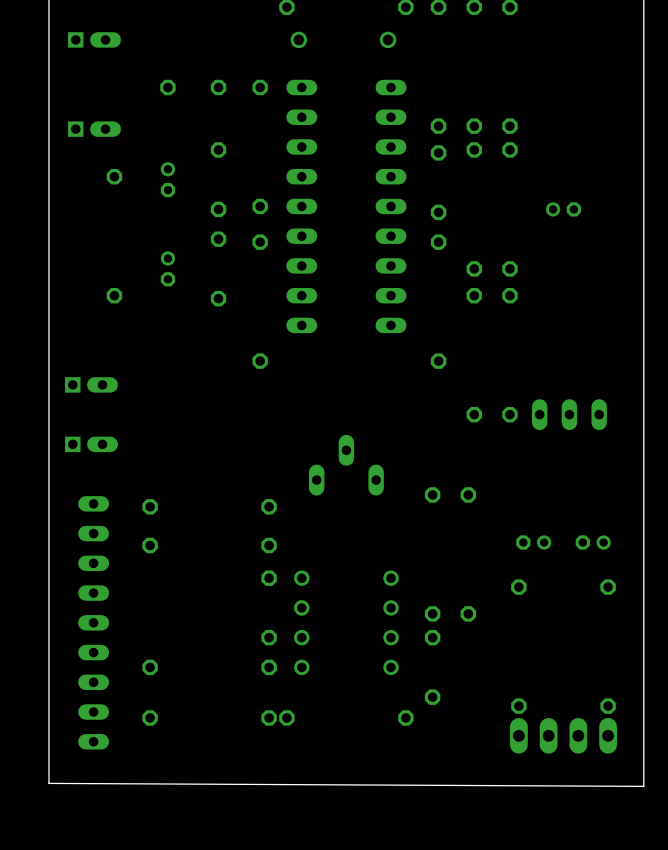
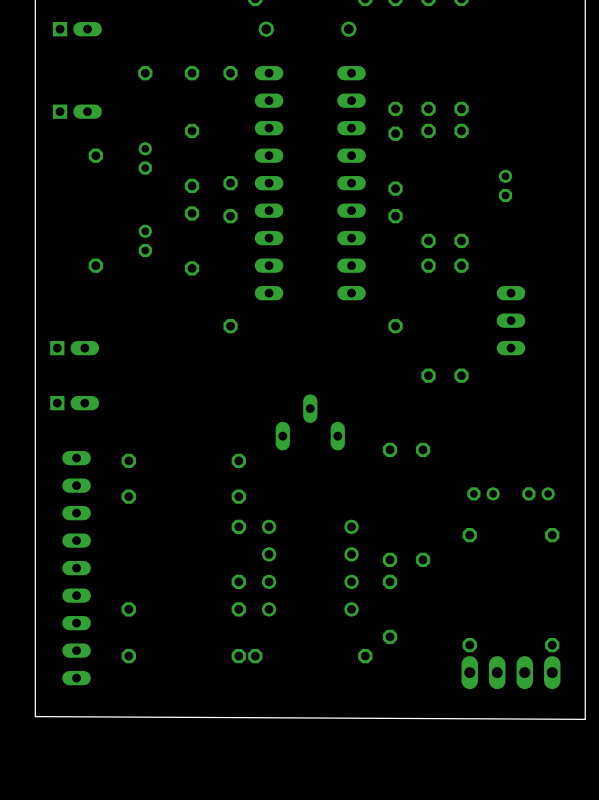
part rotation: 0° (563, 209) -> 90° clockwise (505, 185)
part rotation: 0° (569, 414) -> 90° clockwise (511, 320)
part position: (569, 414) -> (511, 320)

